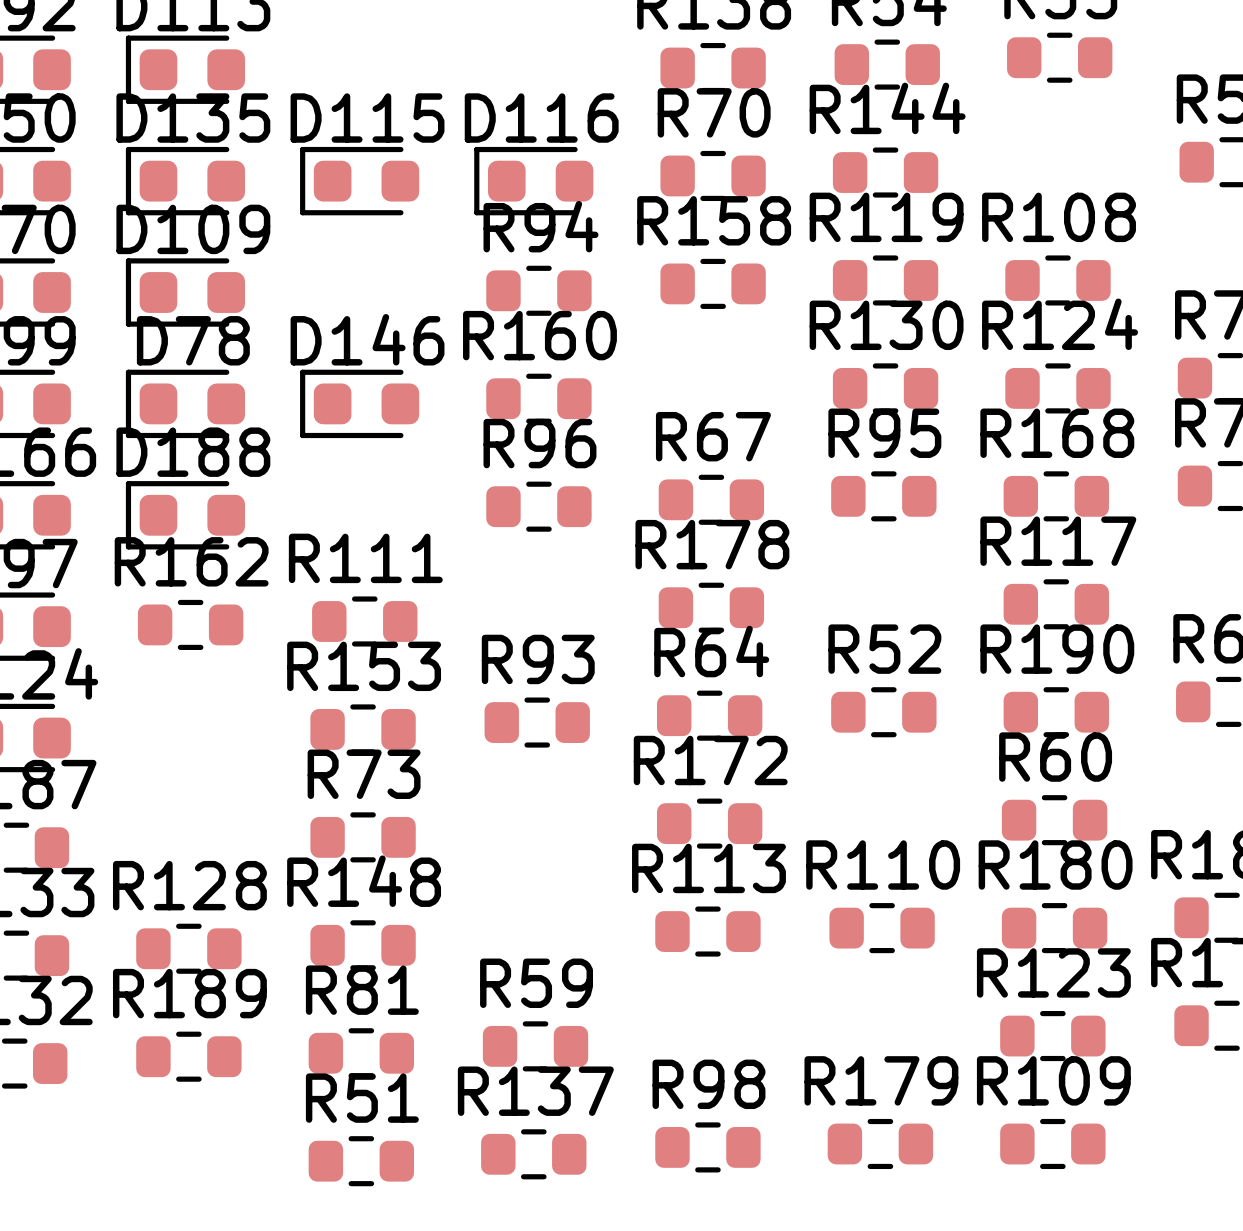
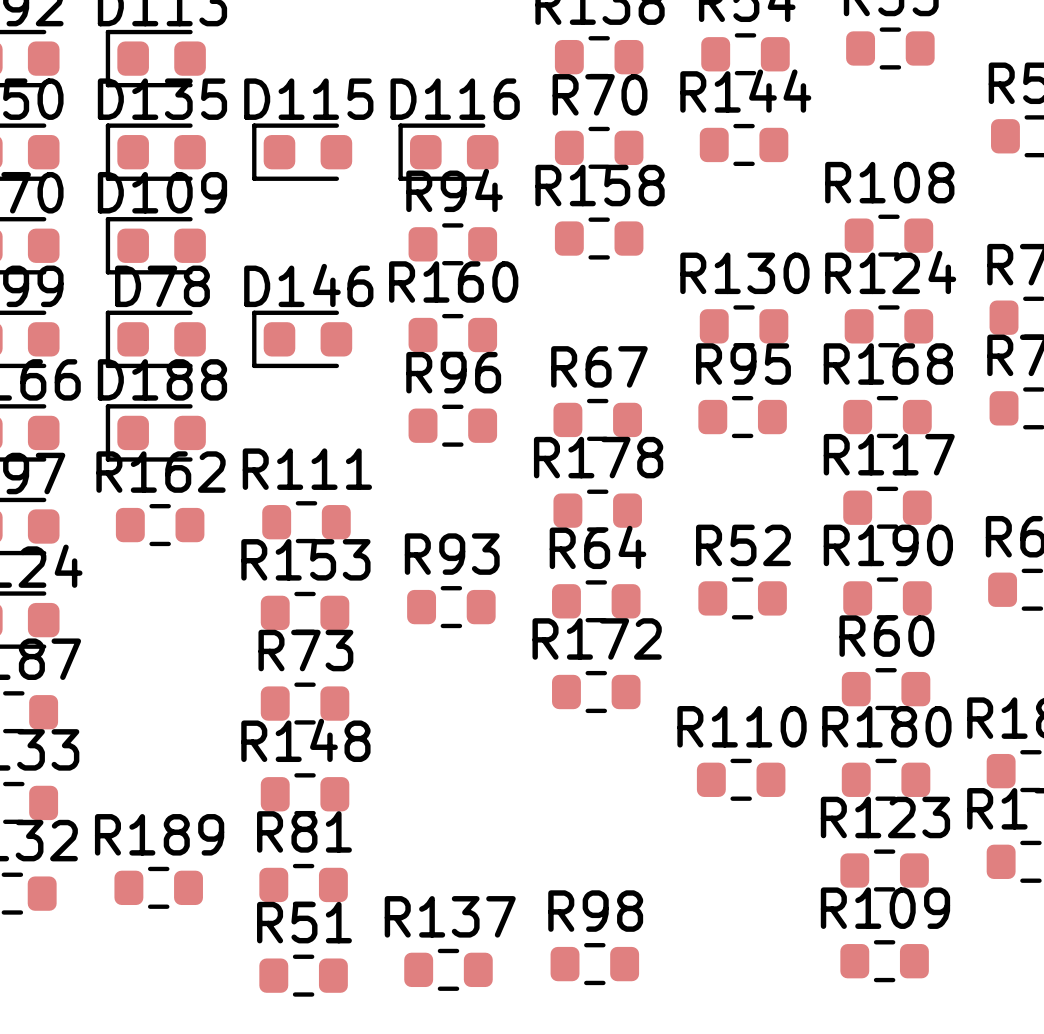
R119: (885, 280) -> none
R113: (707, 931) -> none
R128: (188, 948) -> none
R59: (535, 1046) -> none
R179: (880, 1143) -> none

